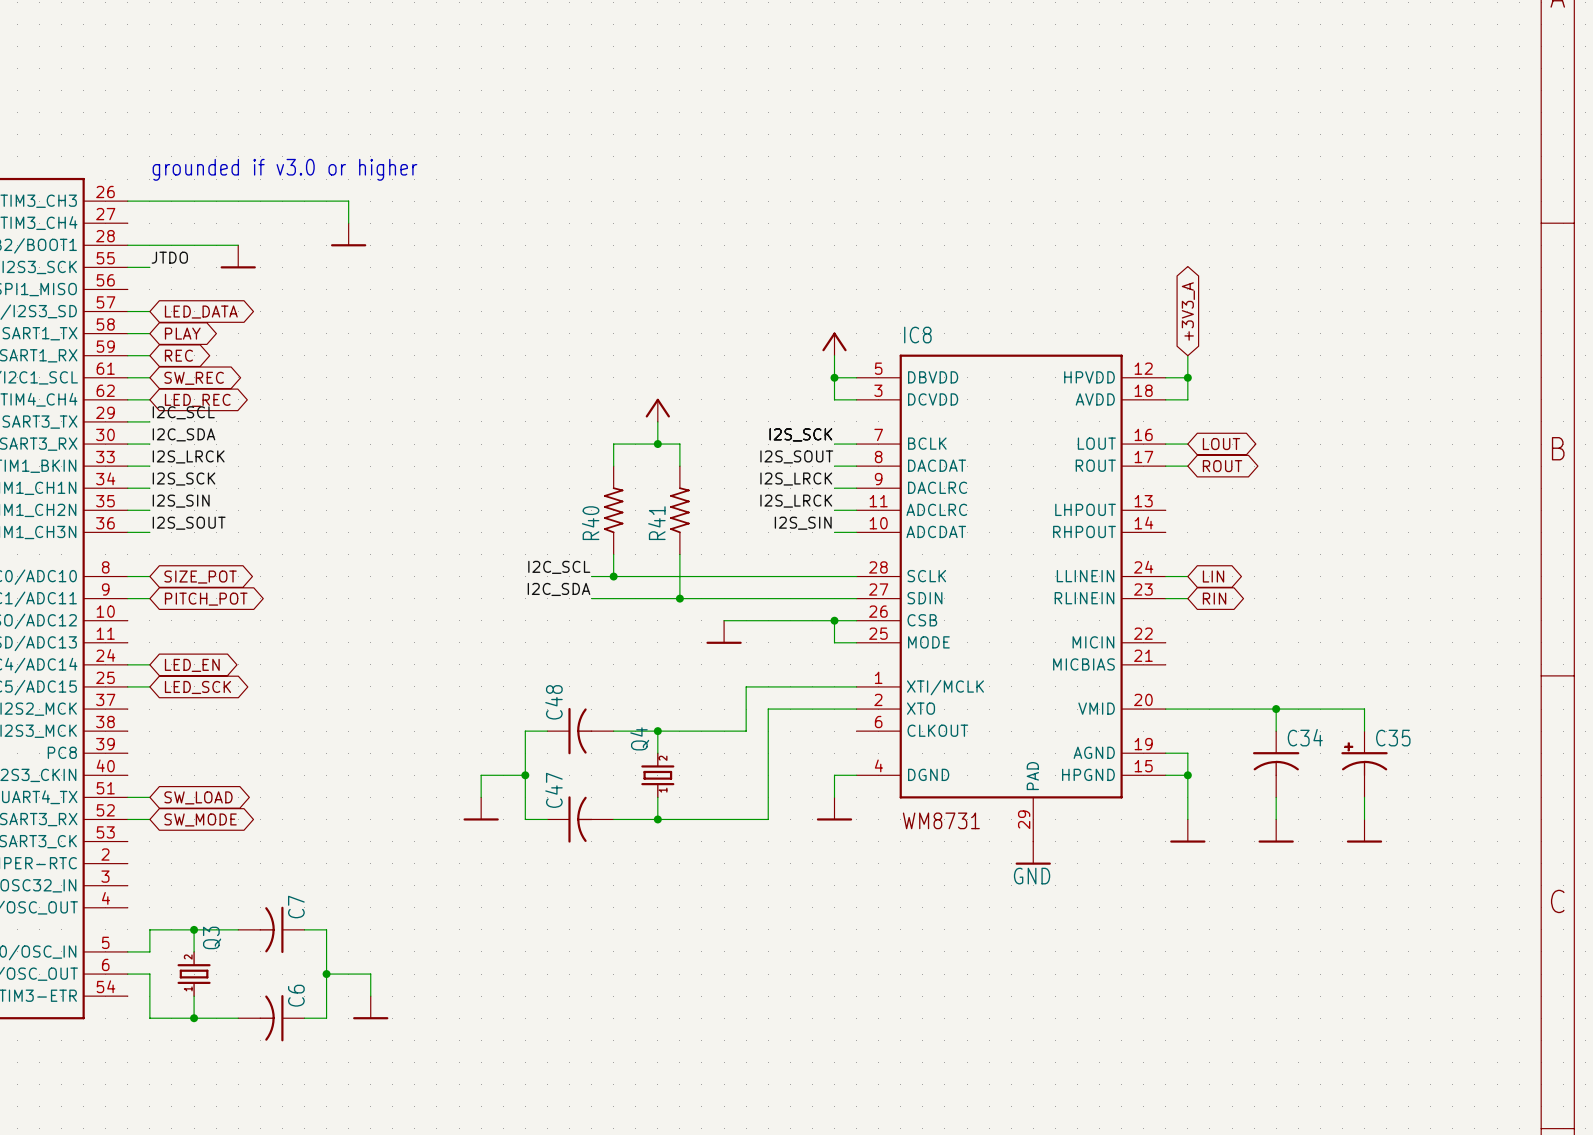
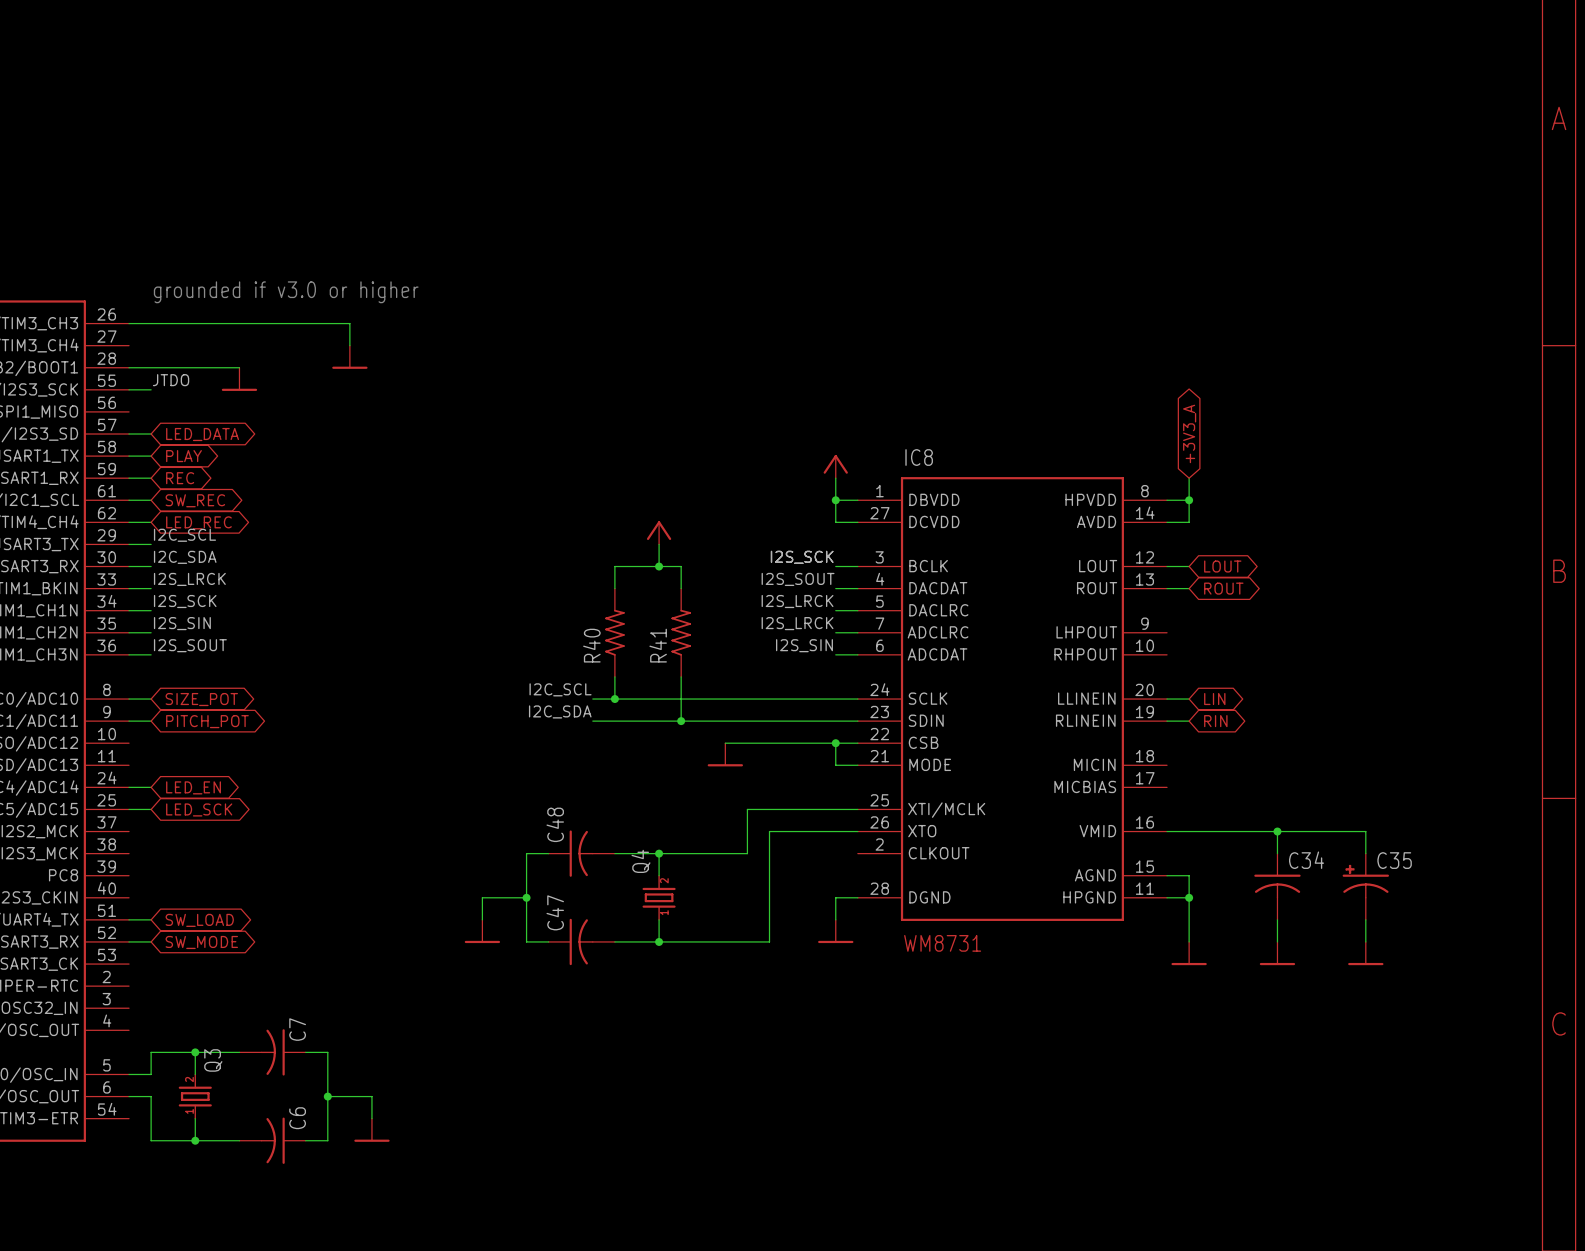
IC8 symbol: [856, 354, 1166, 842] -> [857, 477, 1168, 921]
power symbol: GND (1033, 853) -> none

